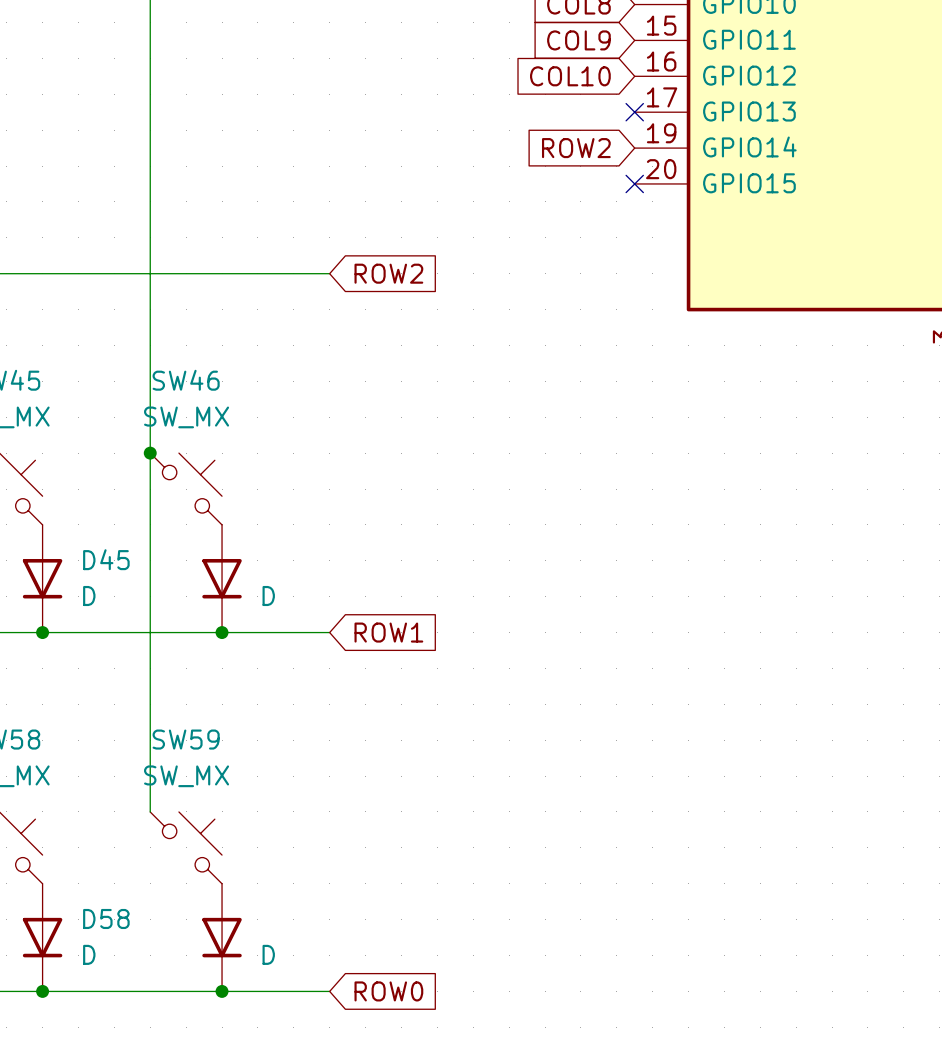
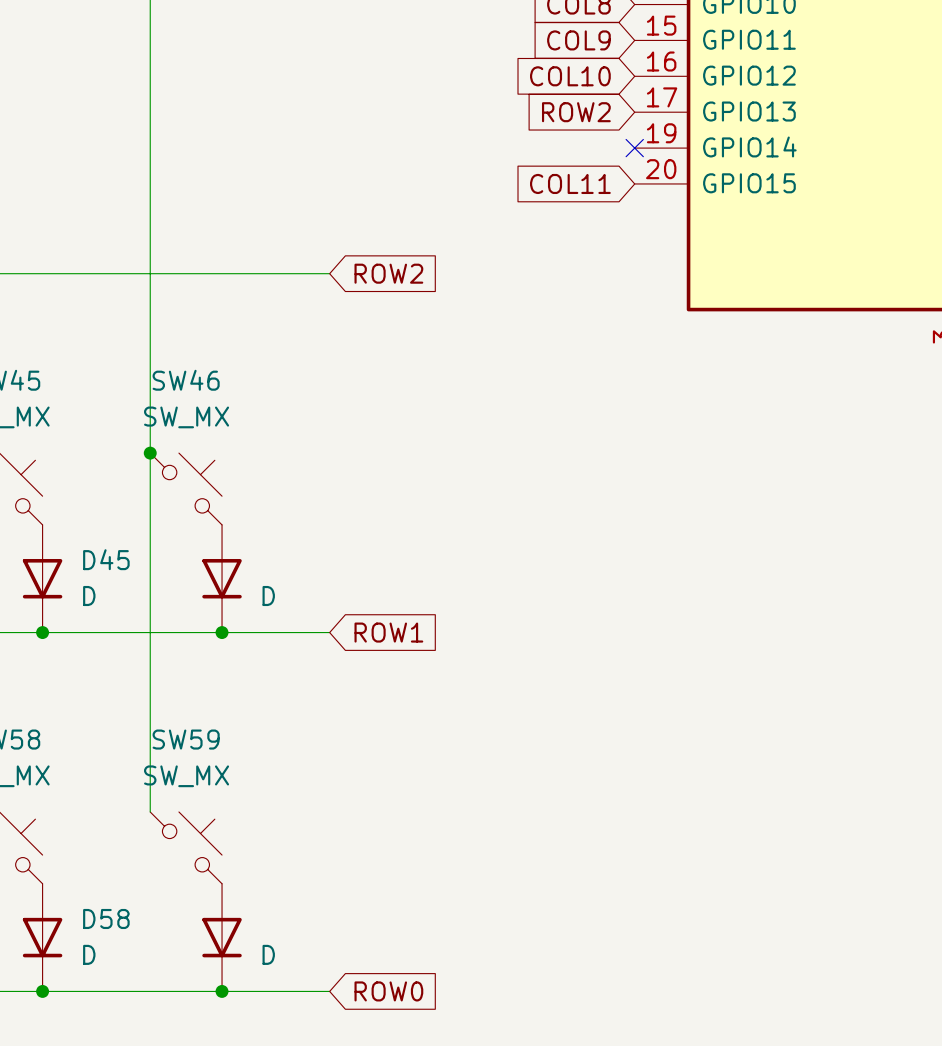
no-connect mark: (634, 112) -> none
global label position: ROW2 (576, 148) -> ROW2 (576, 112)
no-connect mark: none -> (634, 148)
global label: none -> COL11 (570, 183)
no-connect mark: (634, 183) -> none

